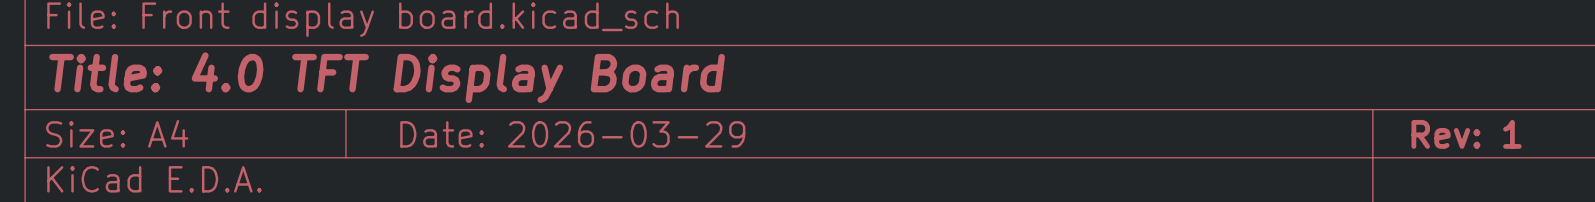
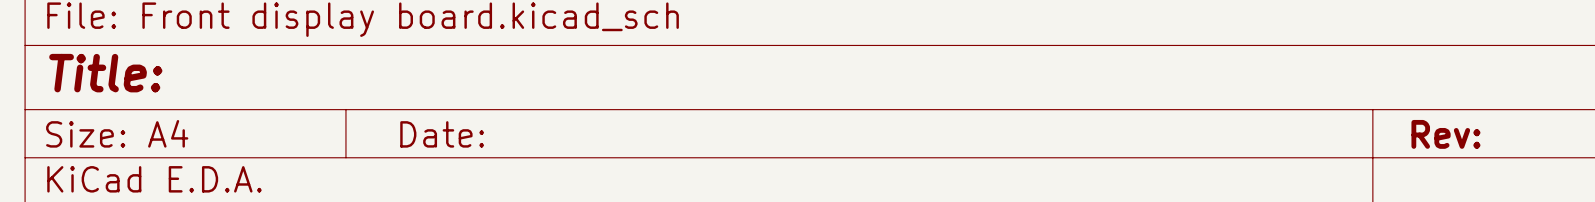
title block: Title: 4.0 TFT Display Board (387, 77) -> Title: (105, 73)
title block: Date: 2026-03-29 (572, 134) -> Date: (442, 134)
title block: Rev: 1 (1466, 134) -> Rev: (1445, 134)

